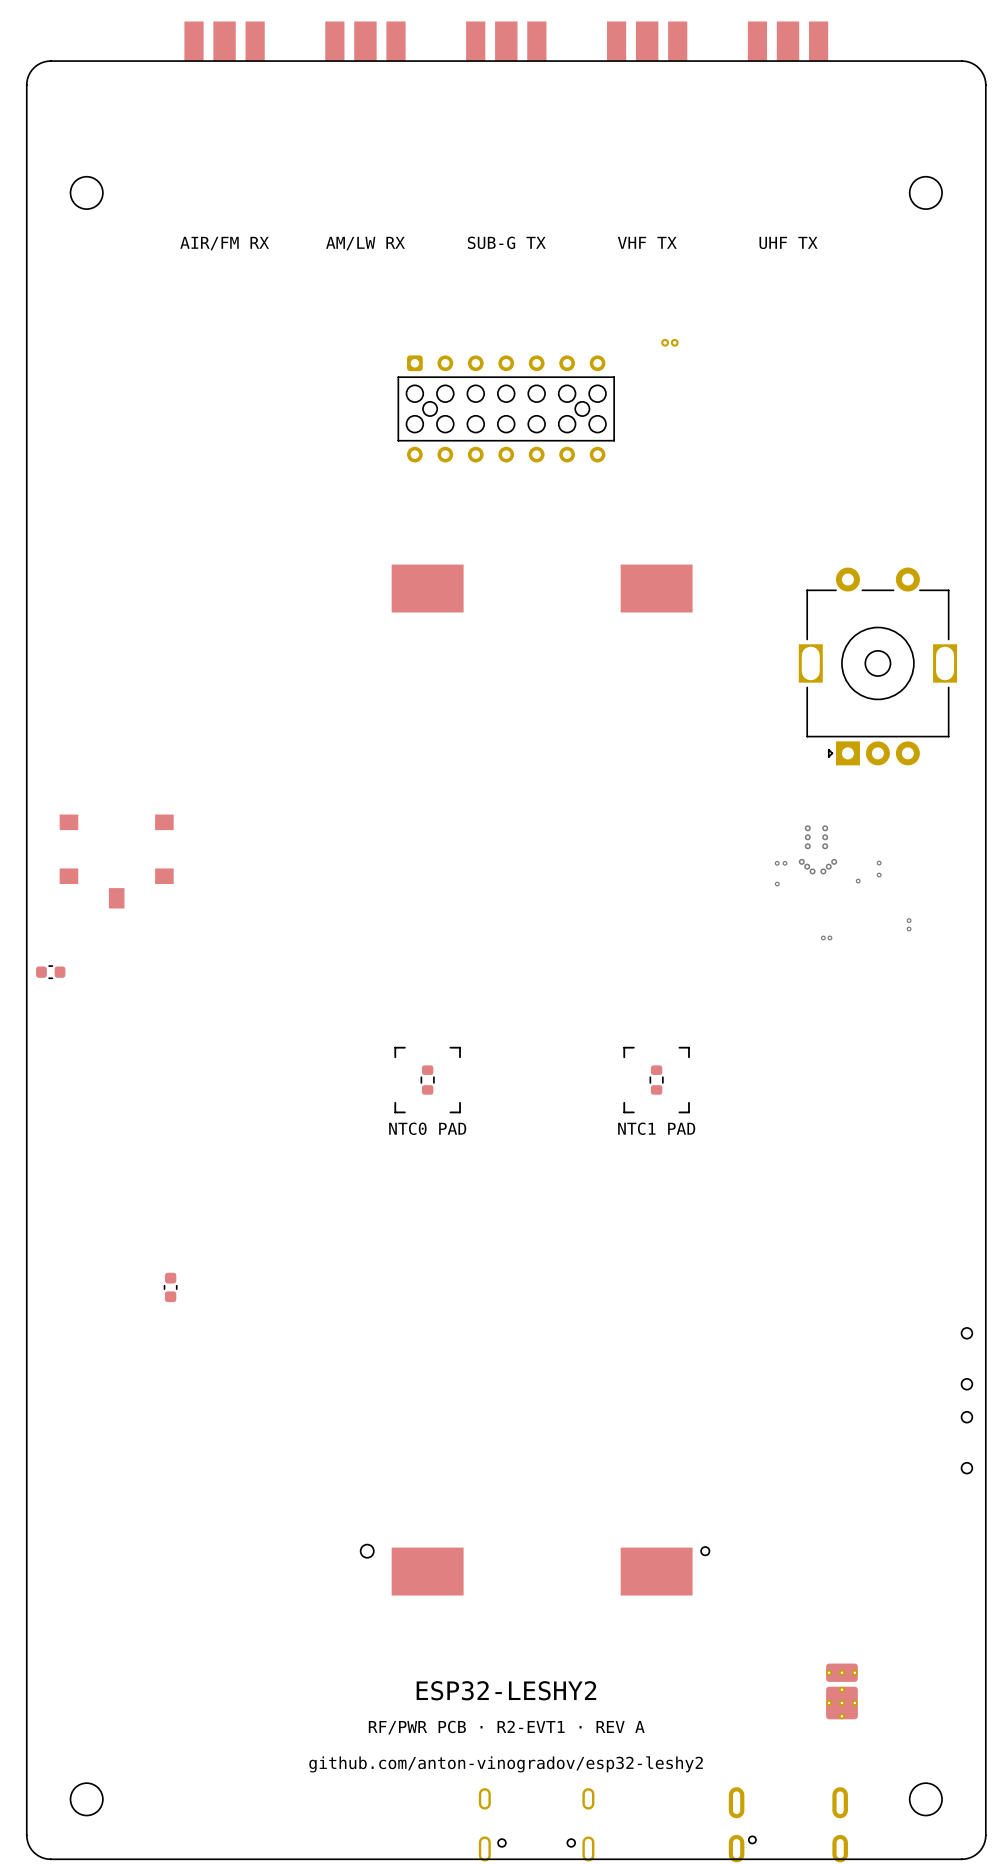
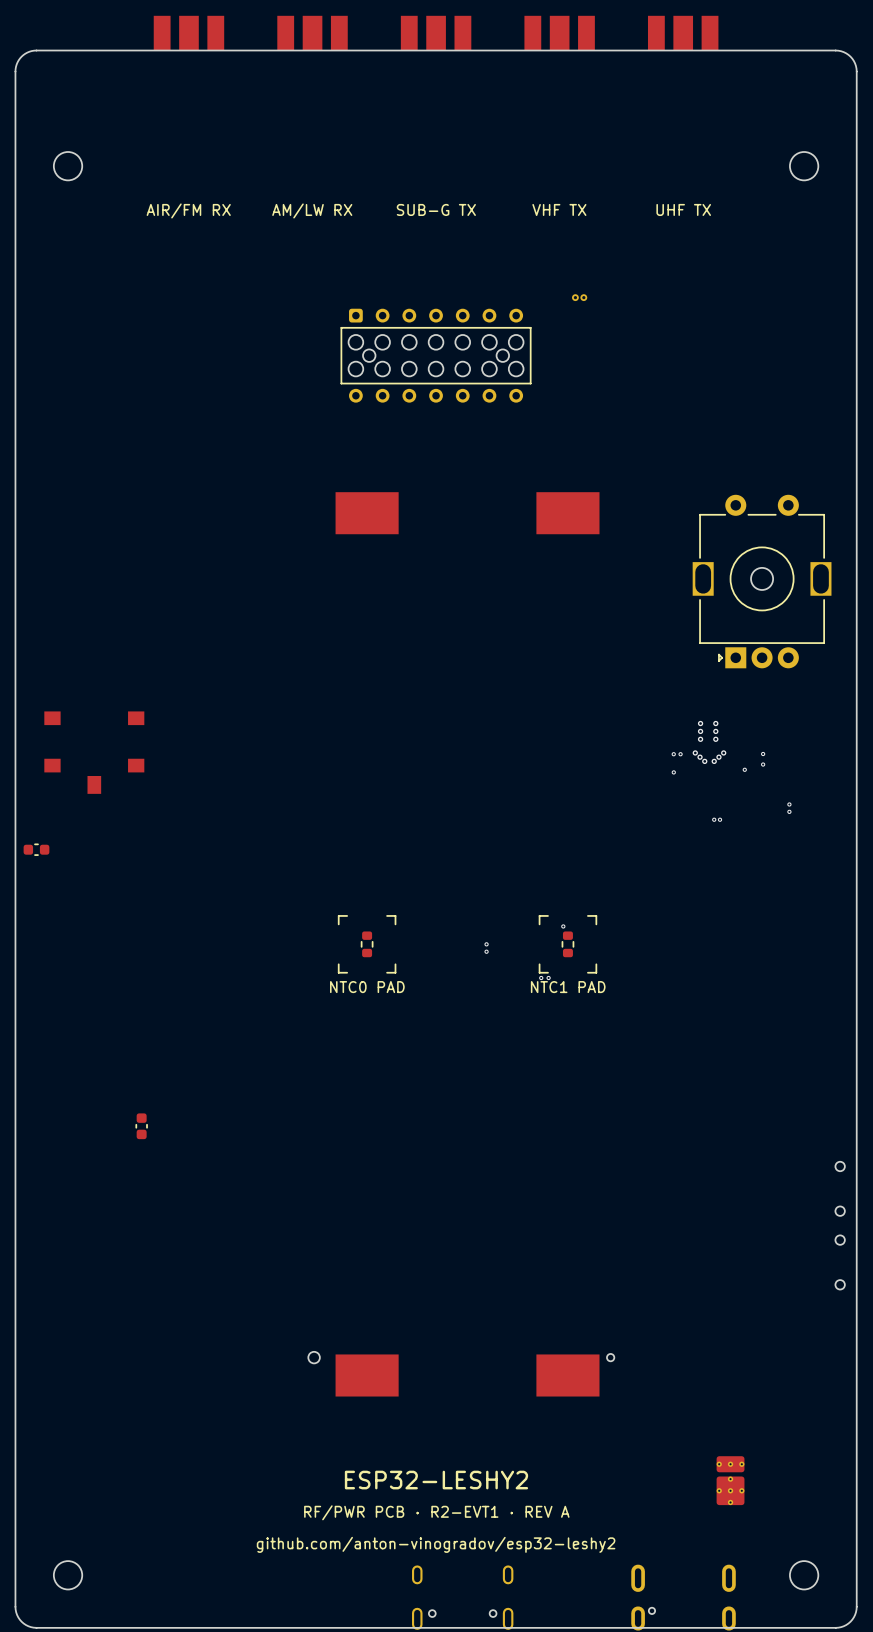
via: none -> (563, 926)
via: none -> (486, 944)
via: none -> (486, 951)
via: none -> (541, 978)
via: none -> (548, 978)

